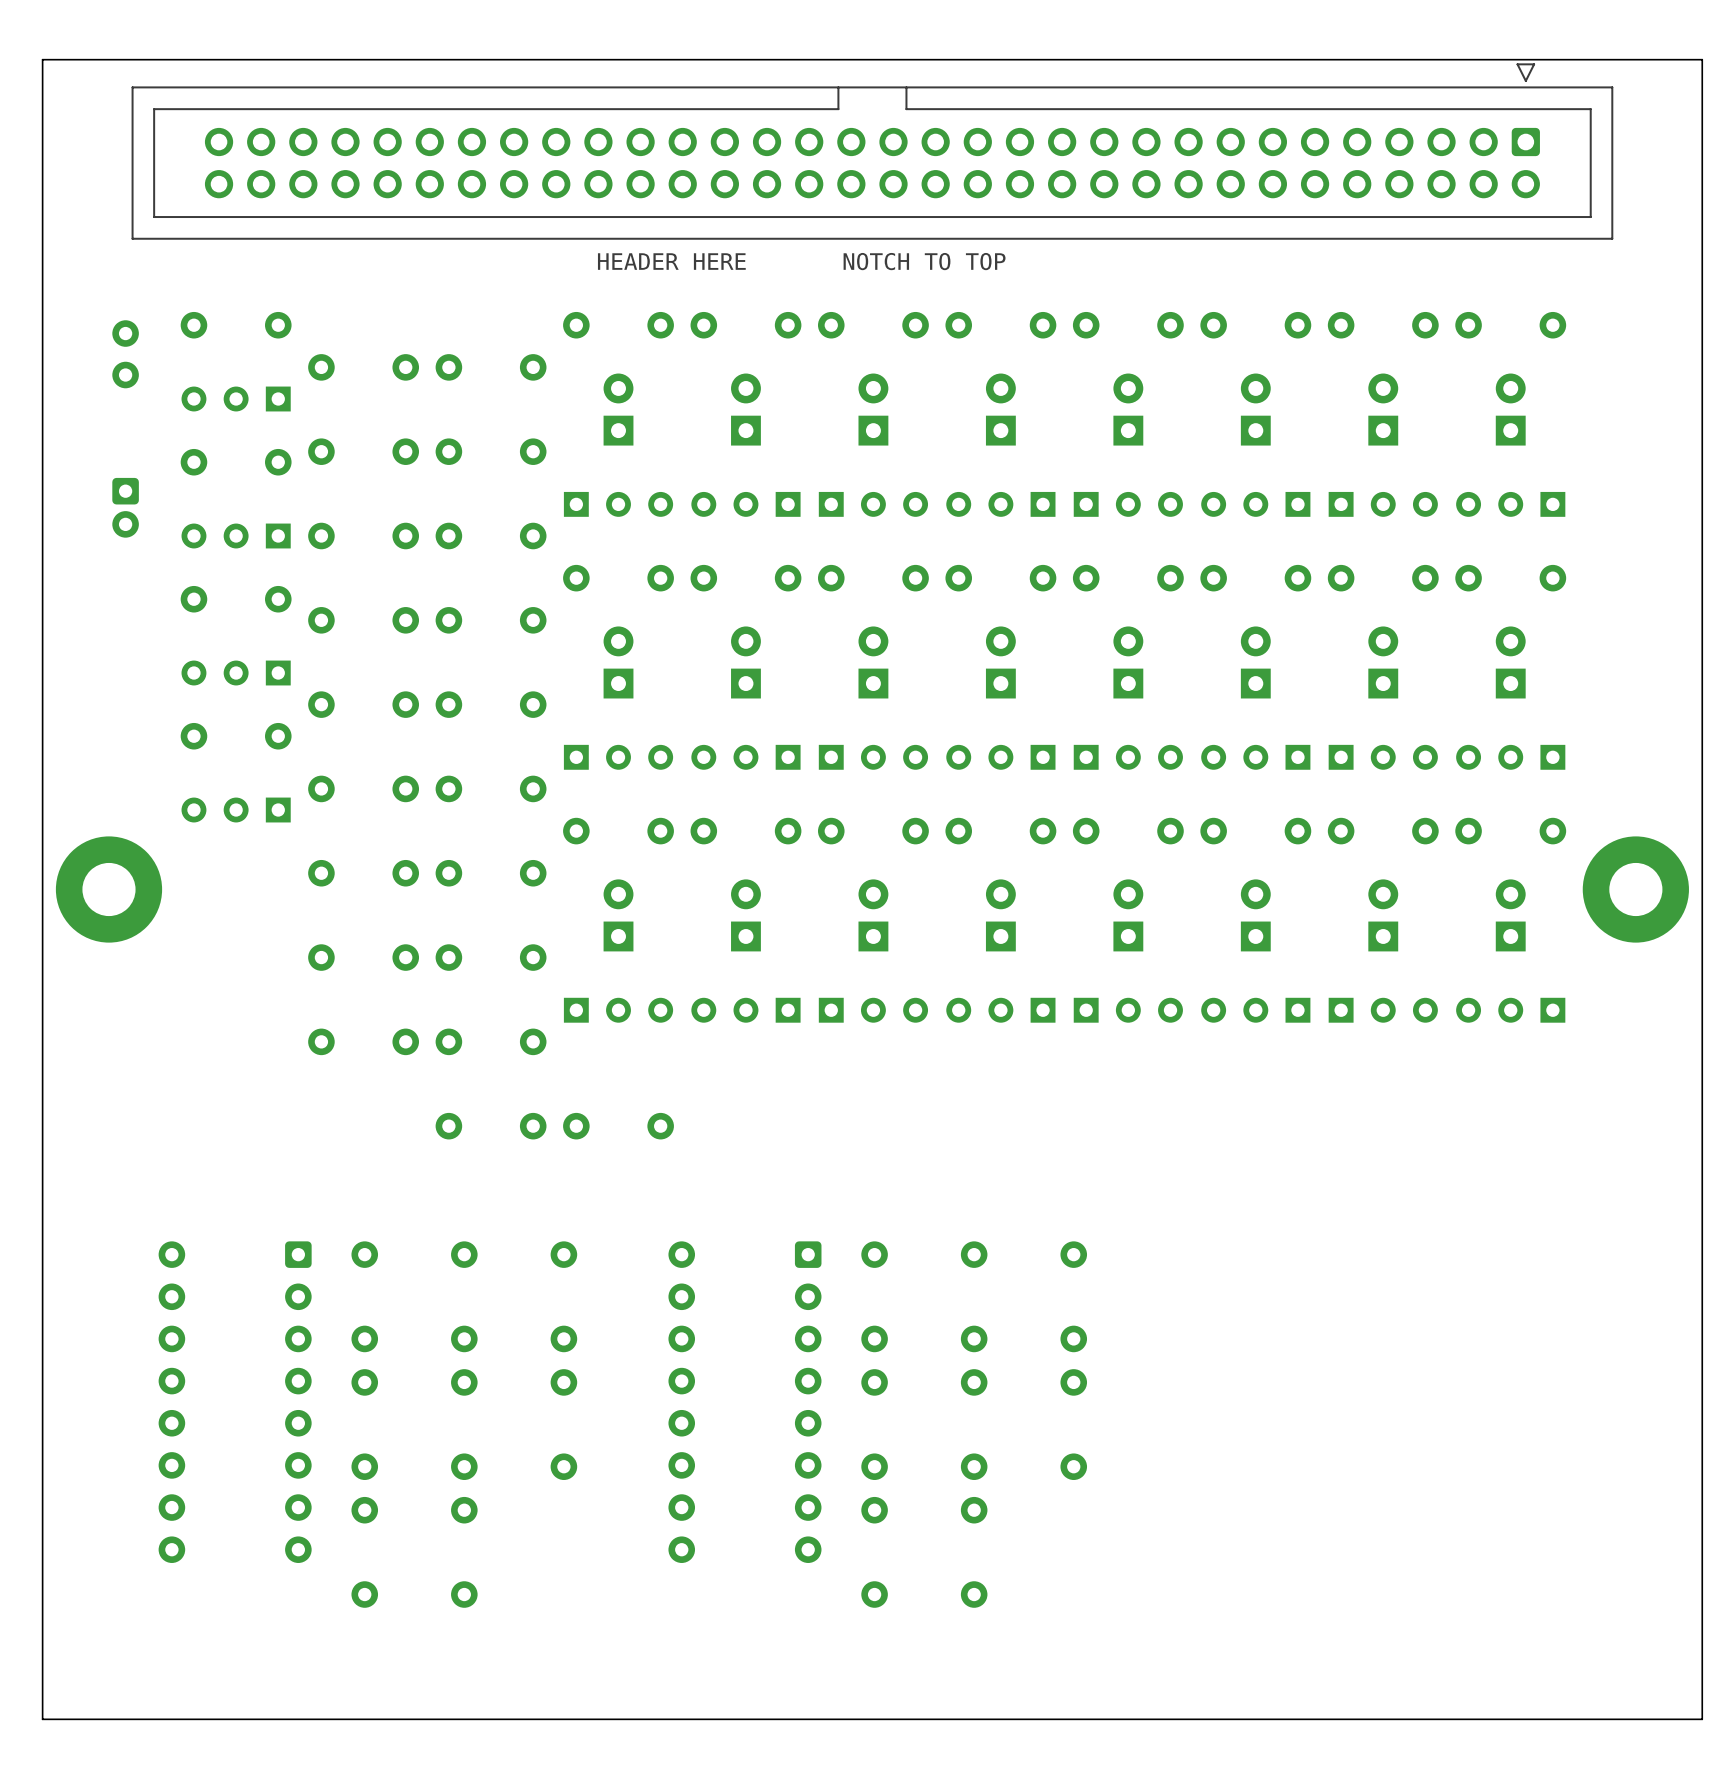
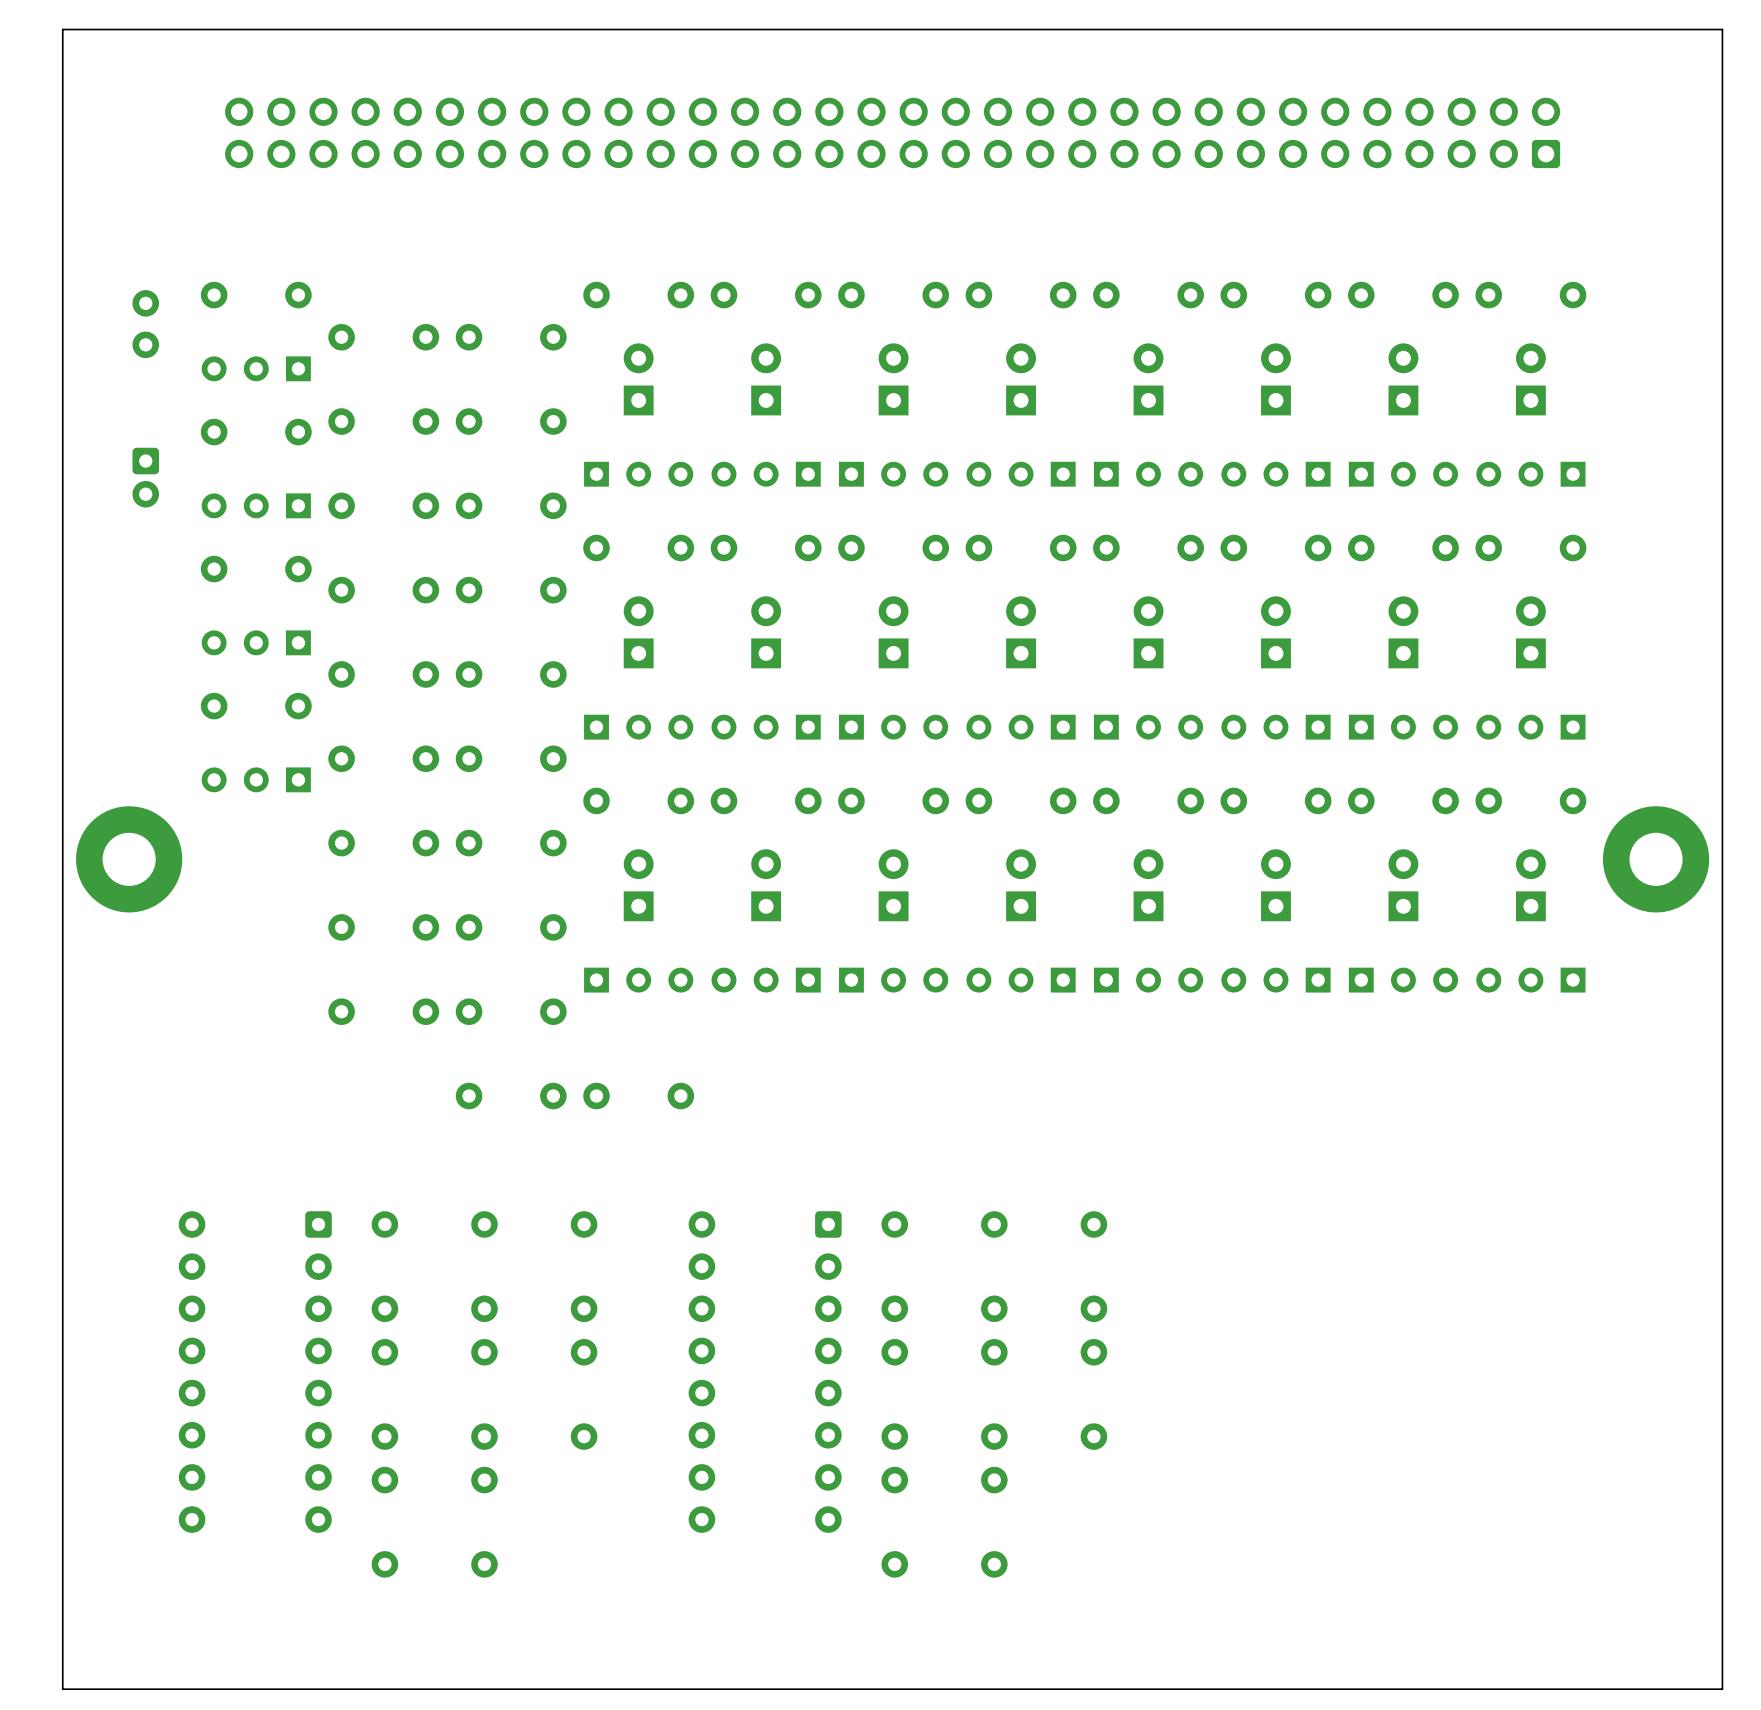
part side: bottom (872, 151) -> top (892, 132)
text: HEADER HERE (671, 261) -> none
text: NOTCH TO TOP (924, 261) -> none

